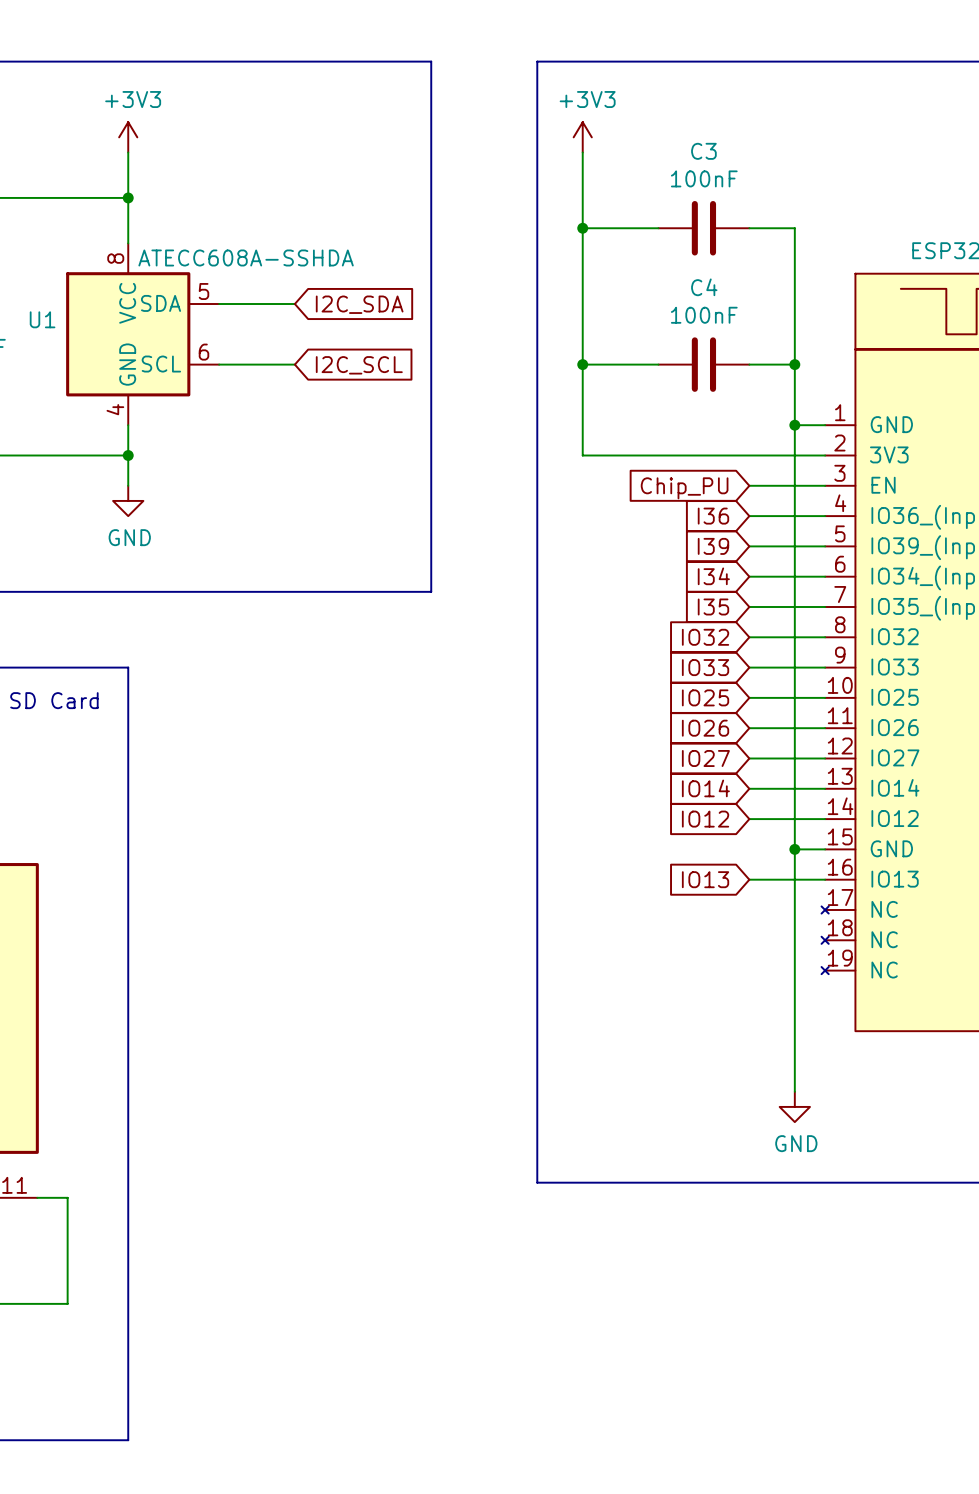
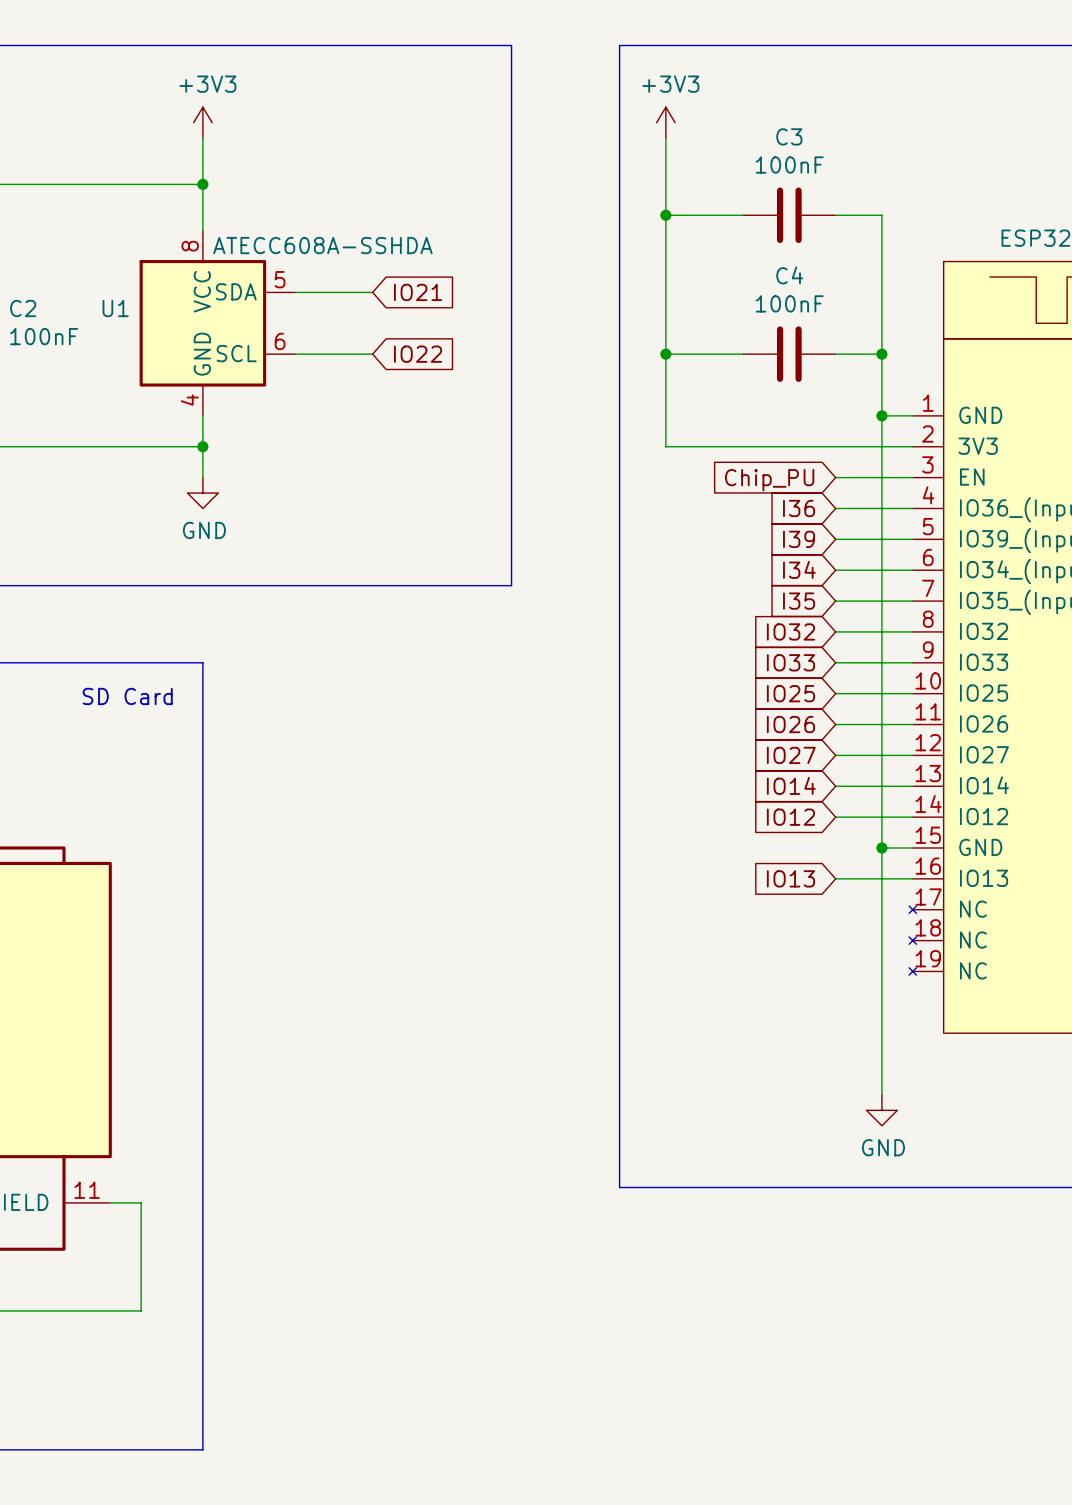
global label: I2C_SDA (359, 304) -> IO21 (418, 292)
global label: I2C_SCL (359, 365) -> IO22 (418, 354)

